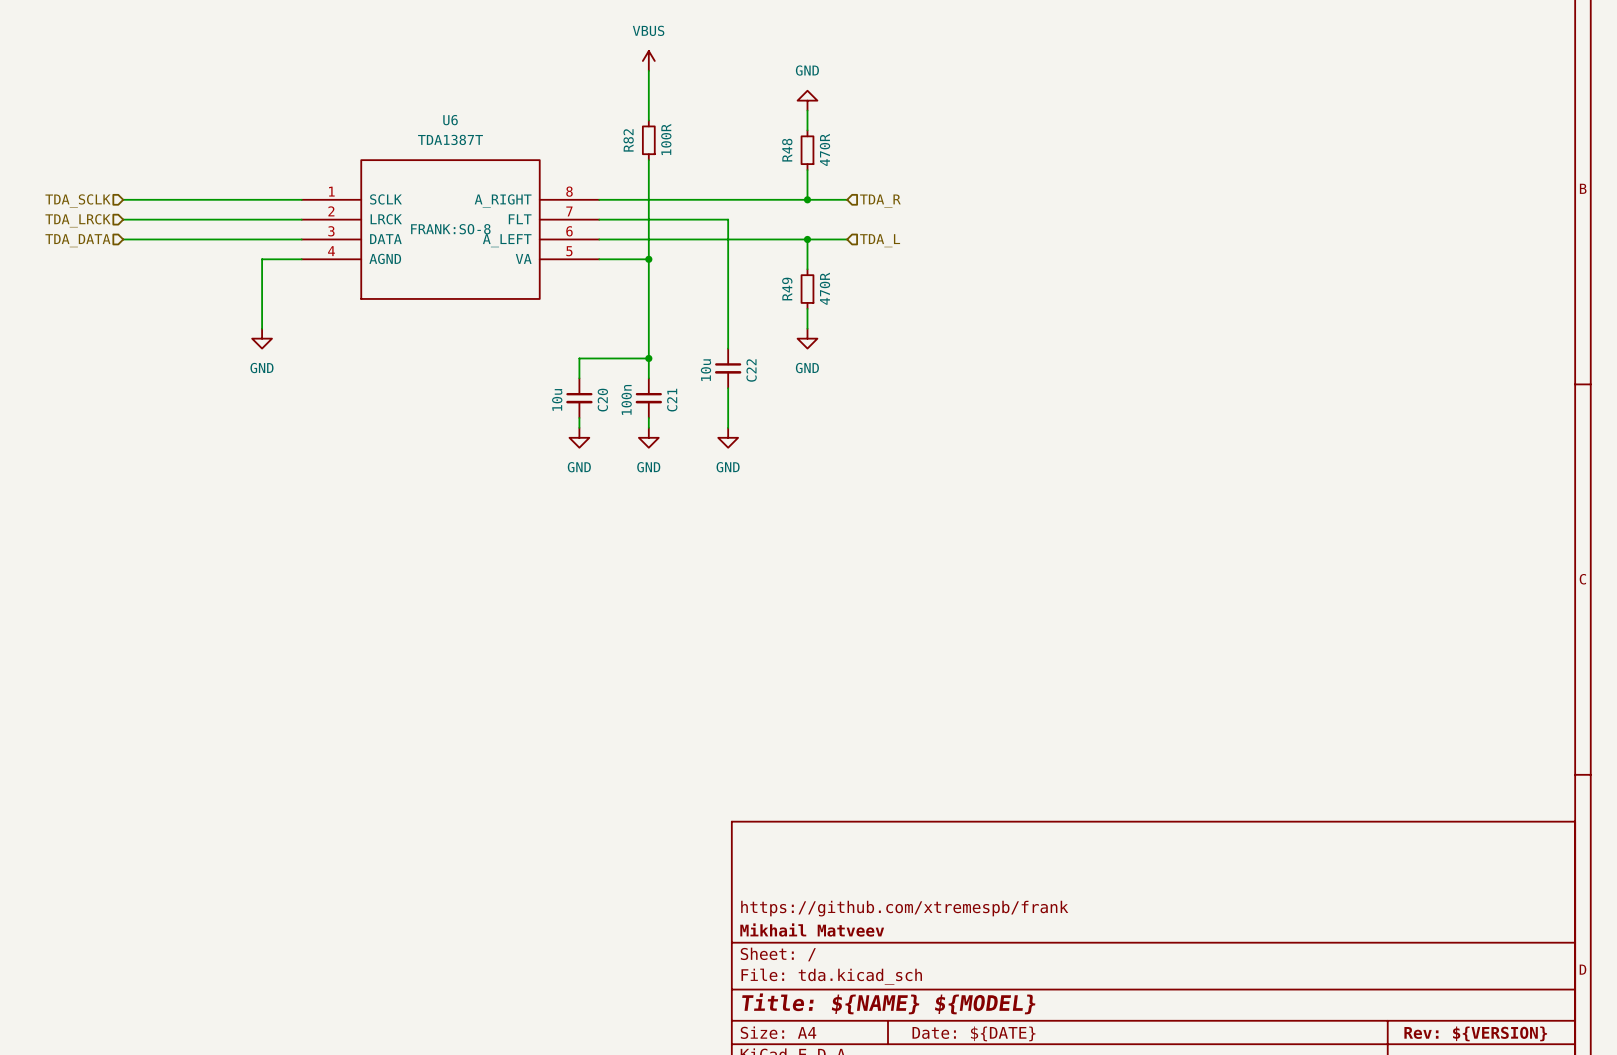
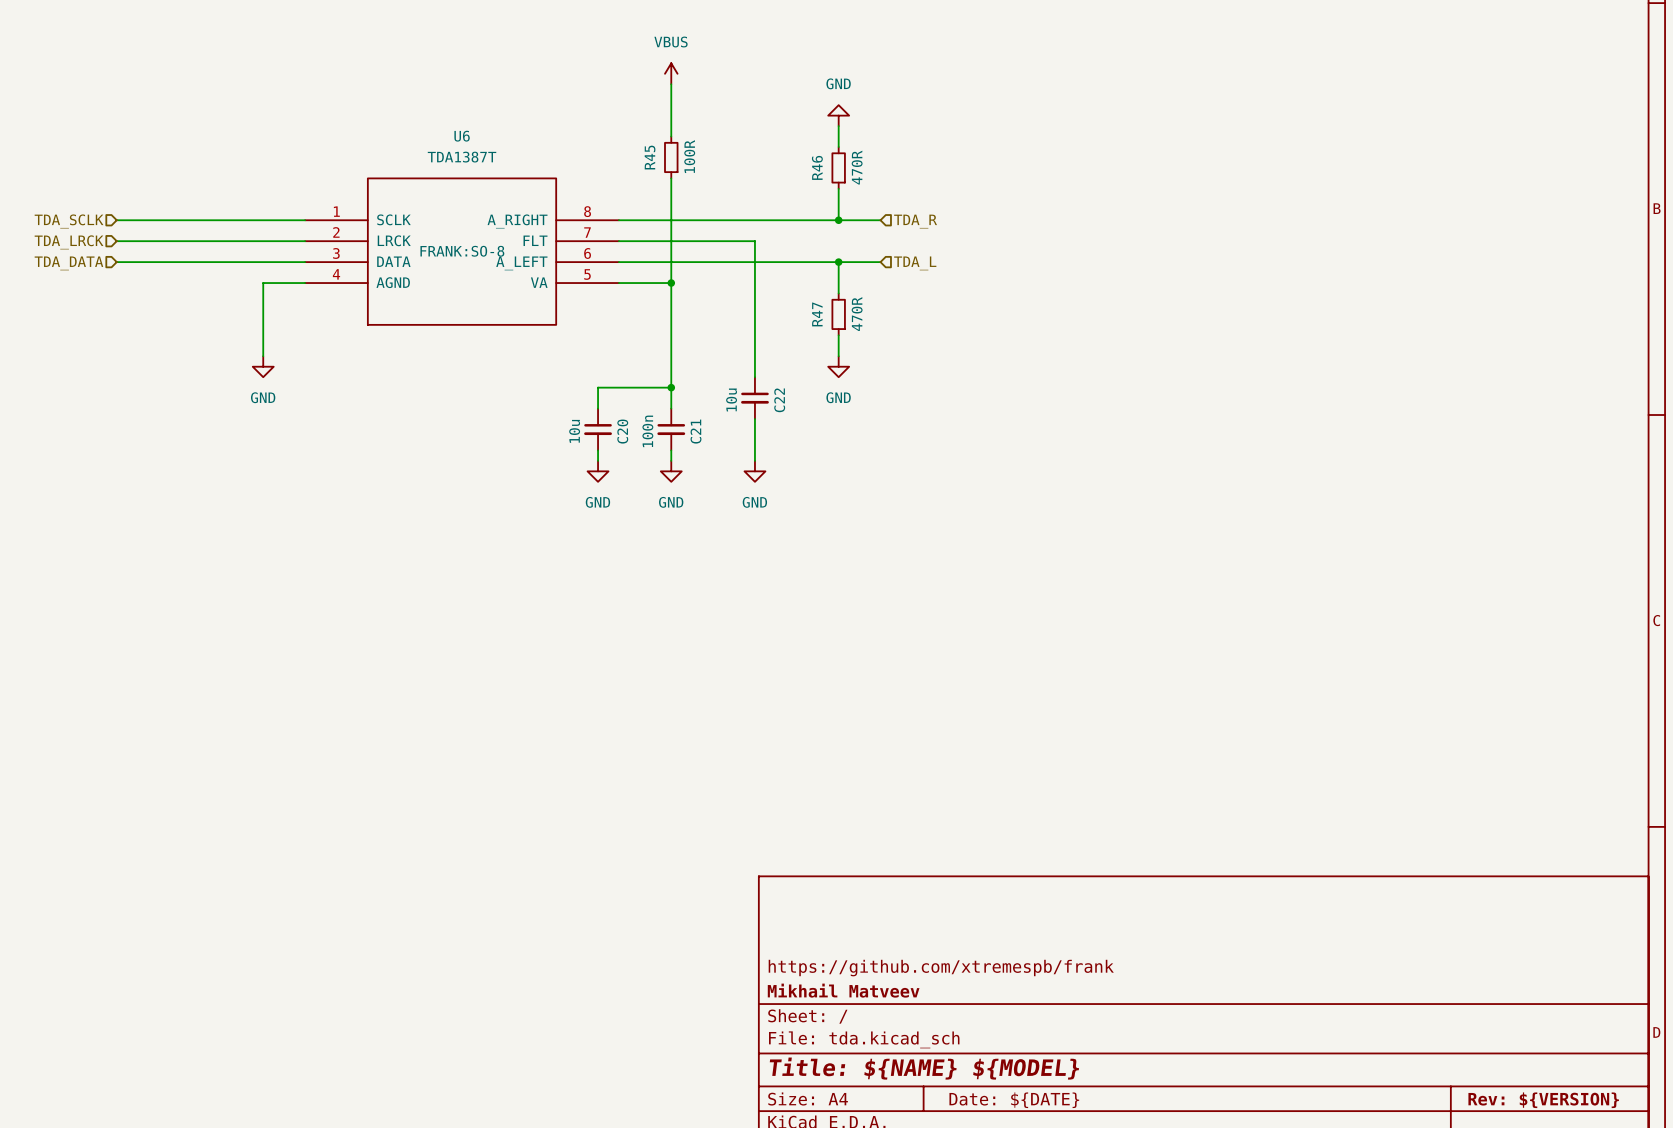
R82 name: R82 (628, 140) -> R45 (650, 157)
R48 name: R48 (787, 150) -> R46 (817, 167)
R49 name: R49 (787, 289) -> R47 (817, 314)

